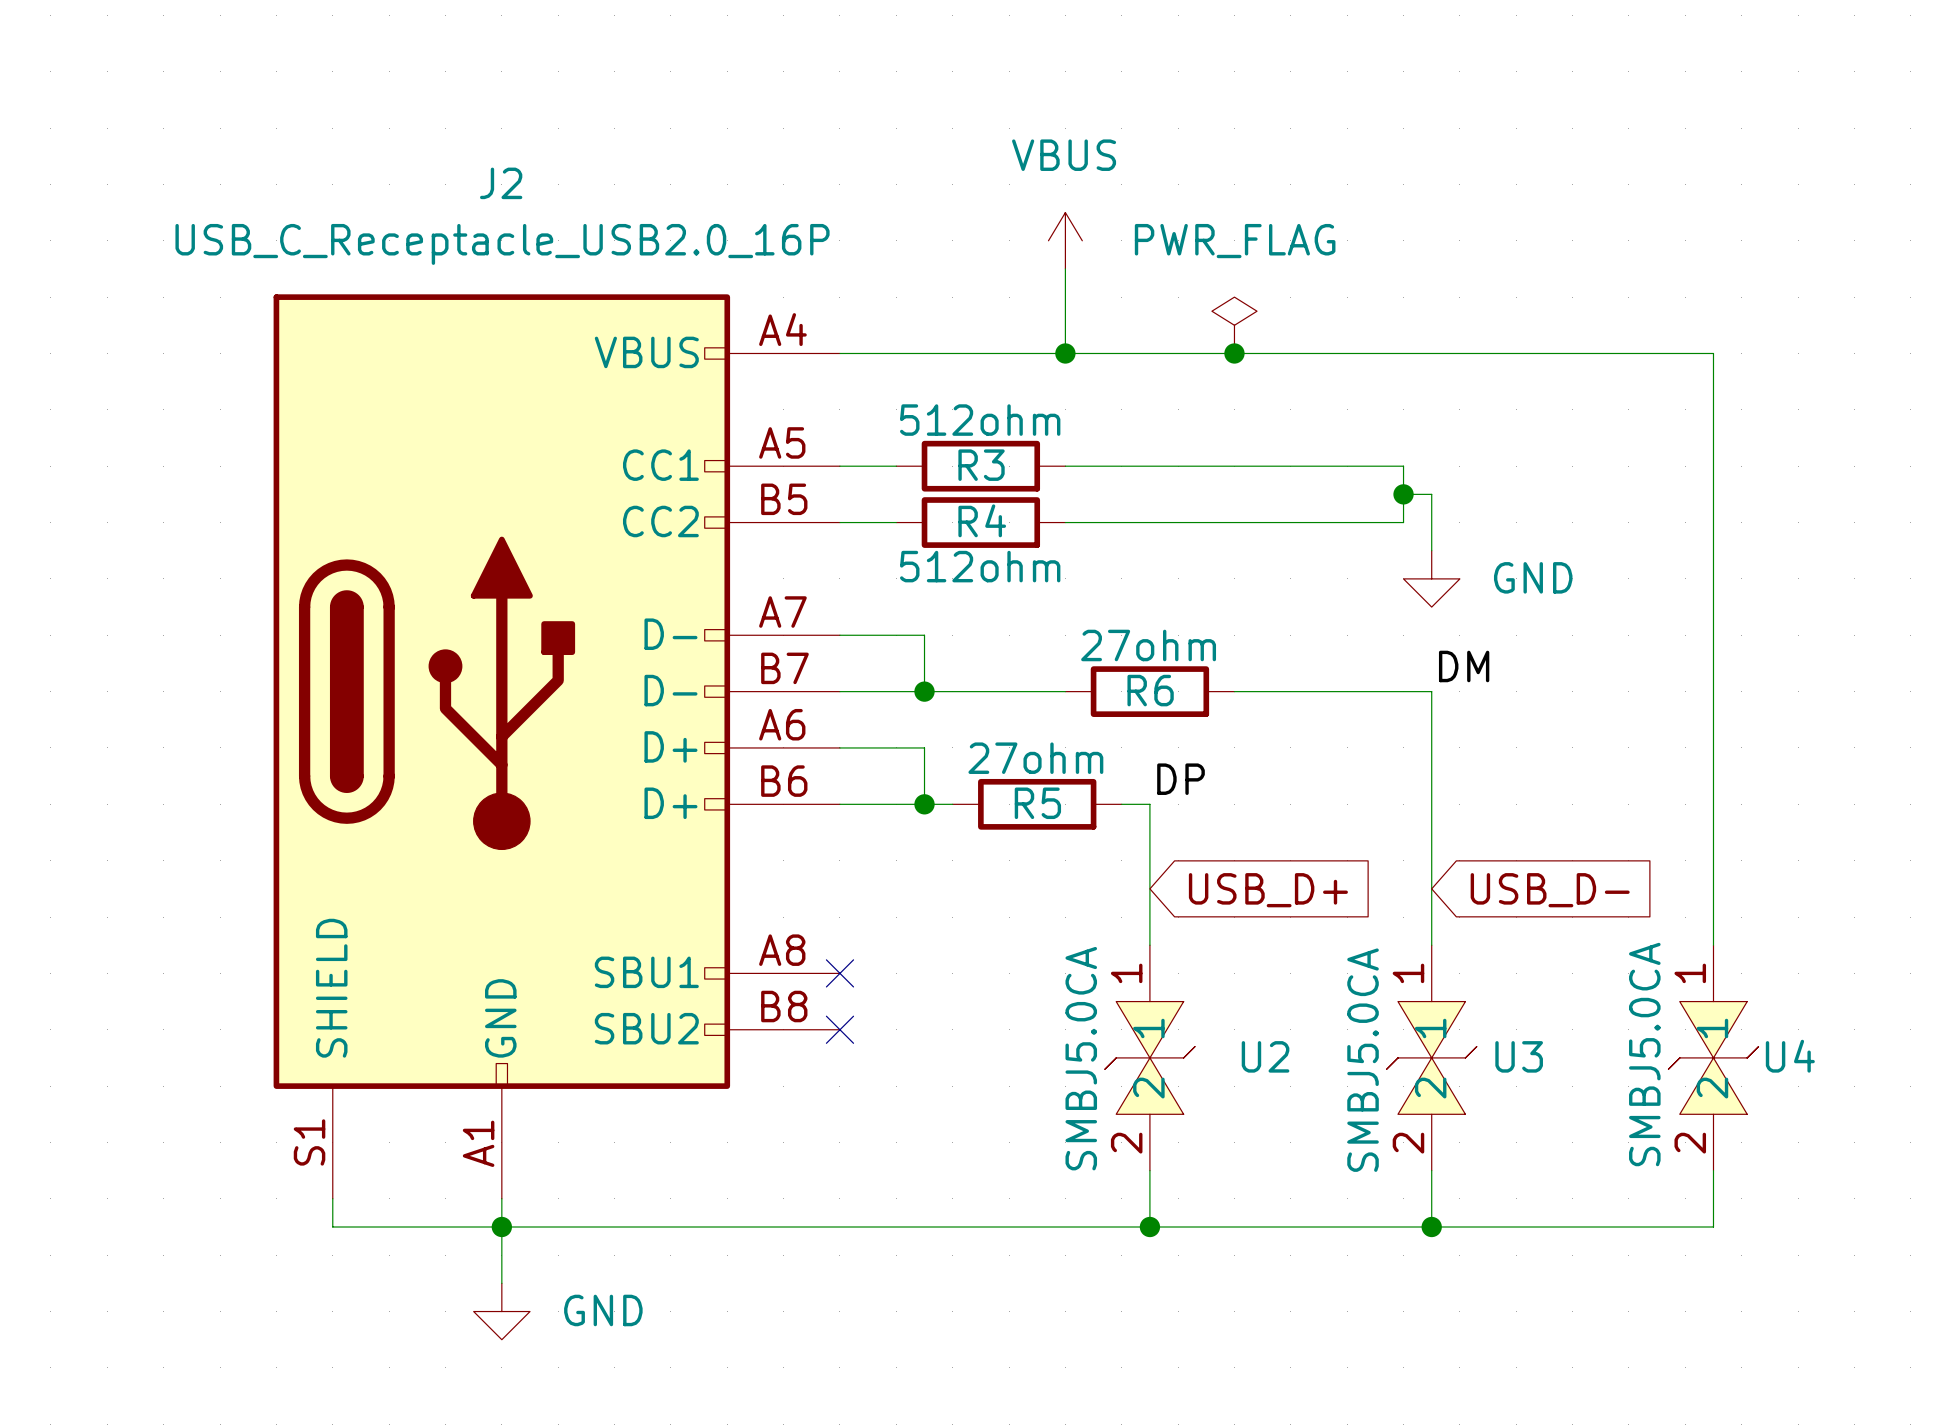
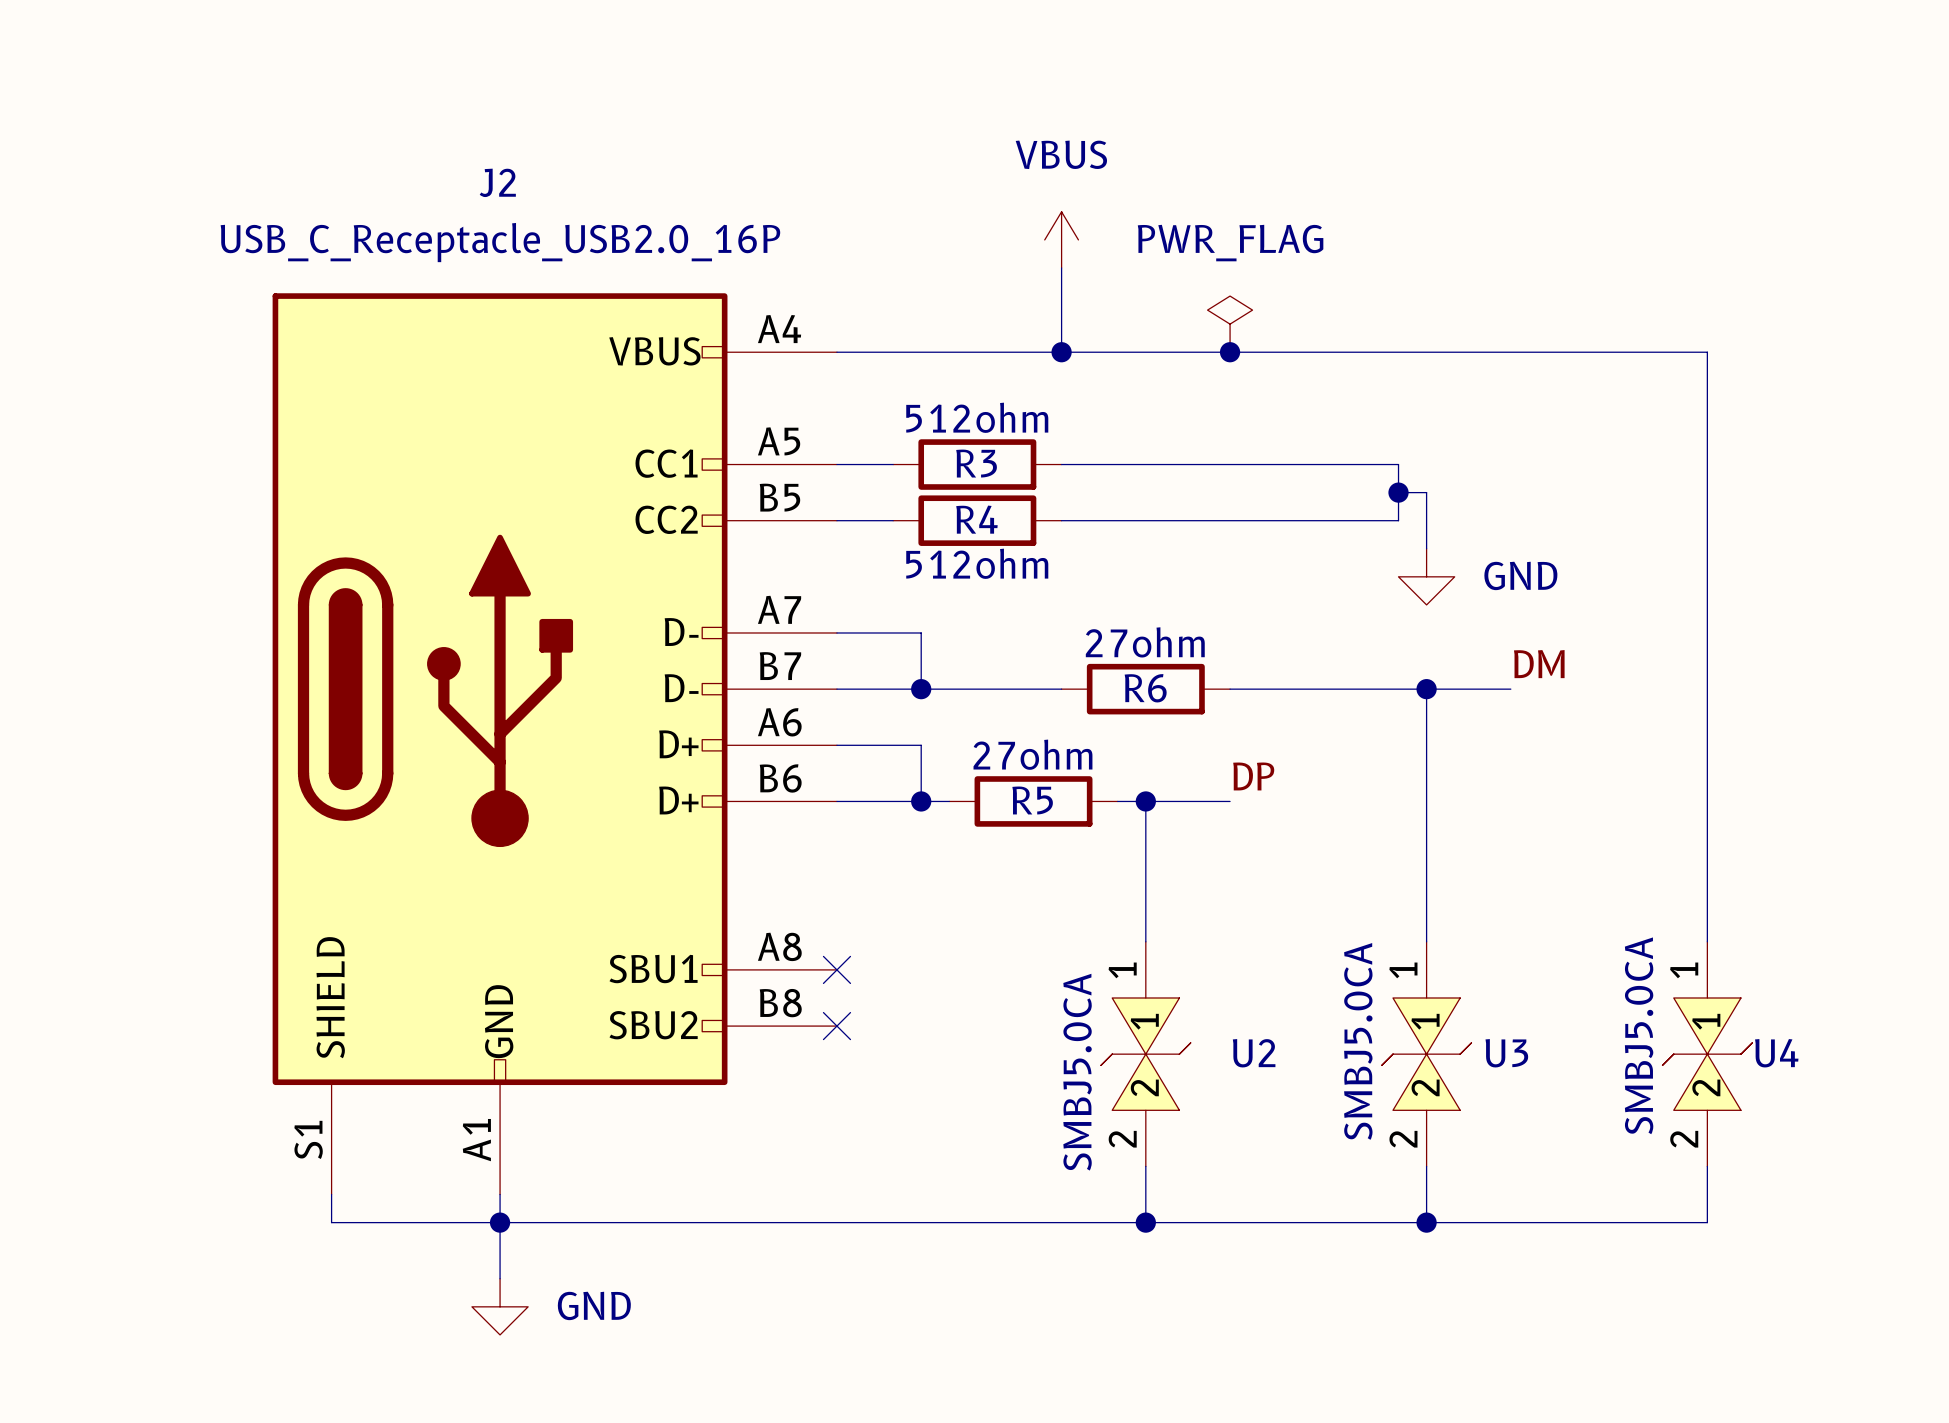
label position: DM (1464, 666) -> DM (1539, 664)
wire: none -> (1426, 689) (1510, 689)
junction: none -> (1426, 689)
label position: DP (1181, 779) -> DP (1253, 776)
wire: none -> (1145, 801) (1230, 801)
junction: none -> (1145, 801)
global label: USB_D+ (1268, 890) -> none
global label: USB_D- (1550, 890) -> none

